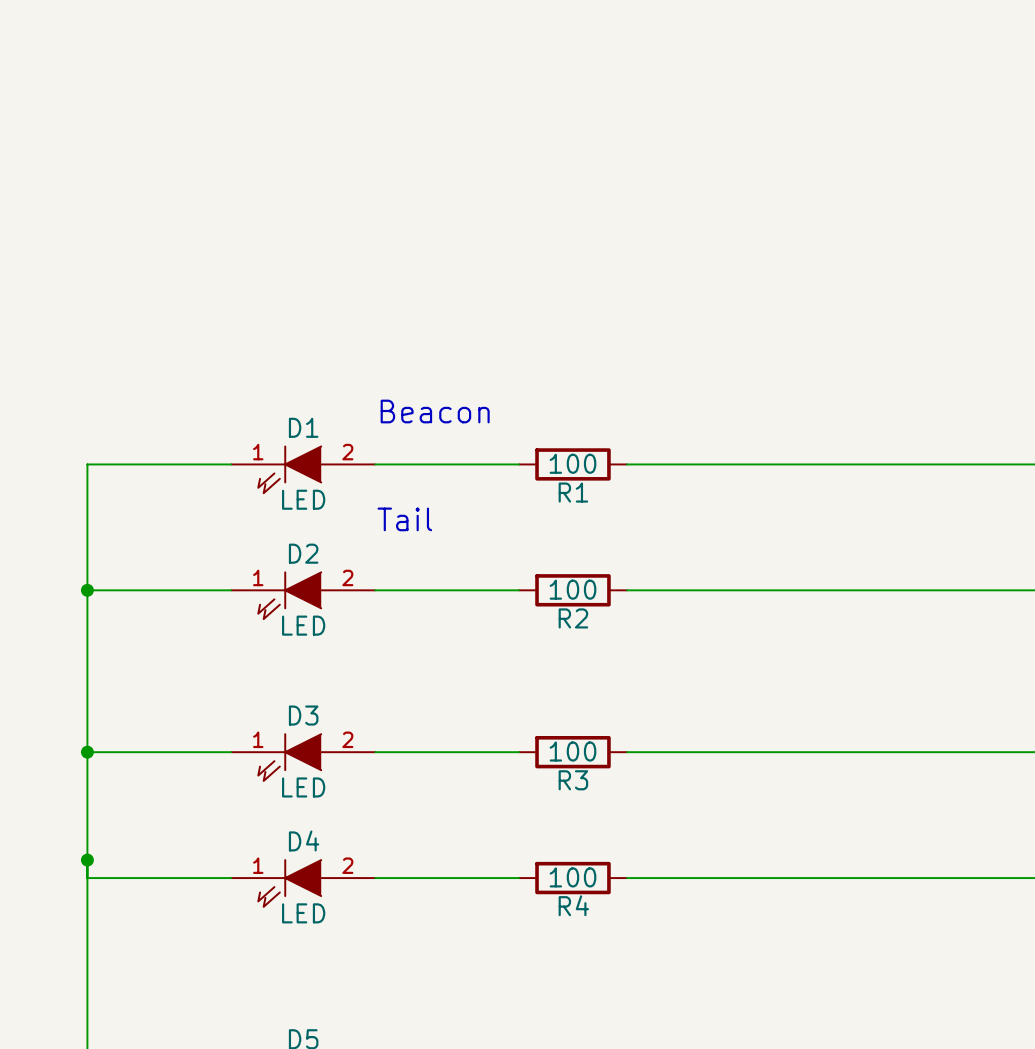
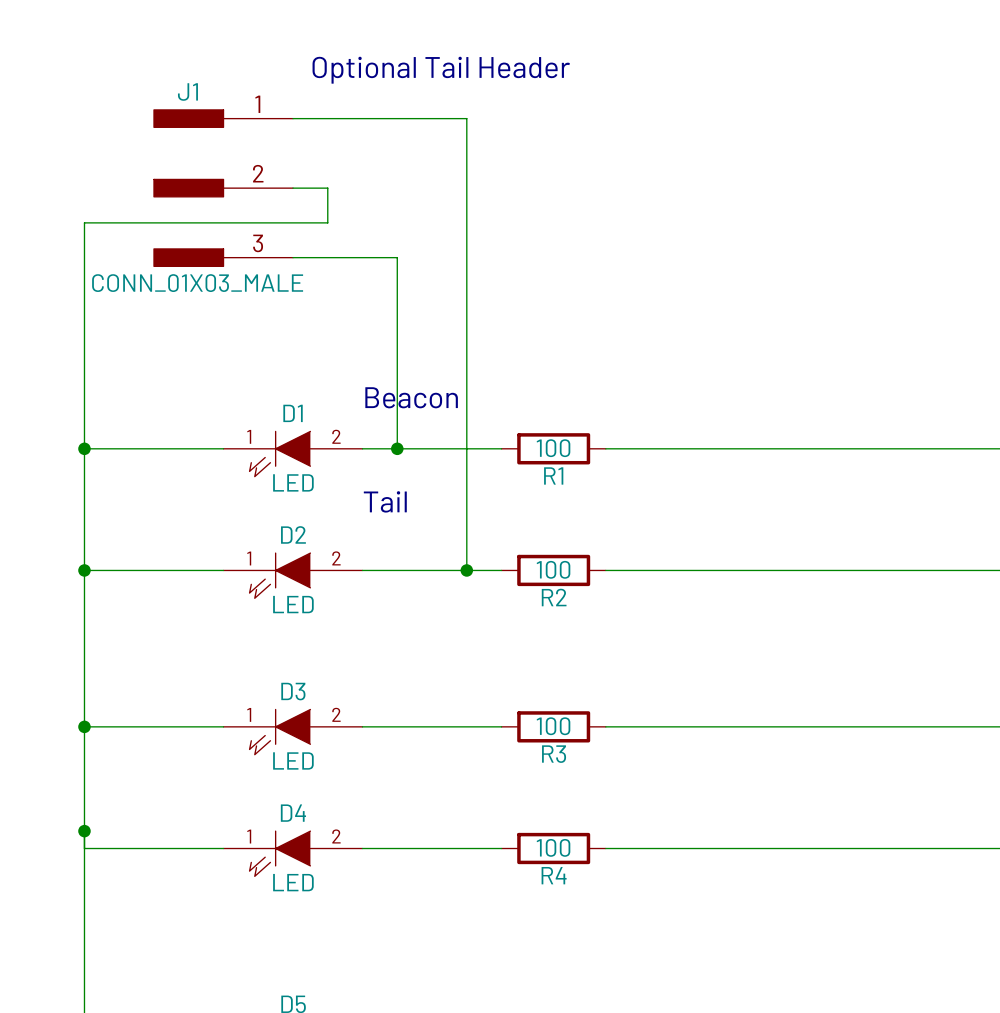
text: none -> Optional Tail Header (441, 70)
wire: none -> (293, 118) (466, 118) (466, 570)
J1: none -> CONN_01X03_MALE (223, 188)
wire: none -> (293, 188) (327, 188) (327, 222) (84, 222) (84, 448)
wire: none -> (293, 257) (397, 257) (397, 448)
junction: none -> (84, 448)
junction: none -> (397, 448)
junction: none -> (466, 570)

